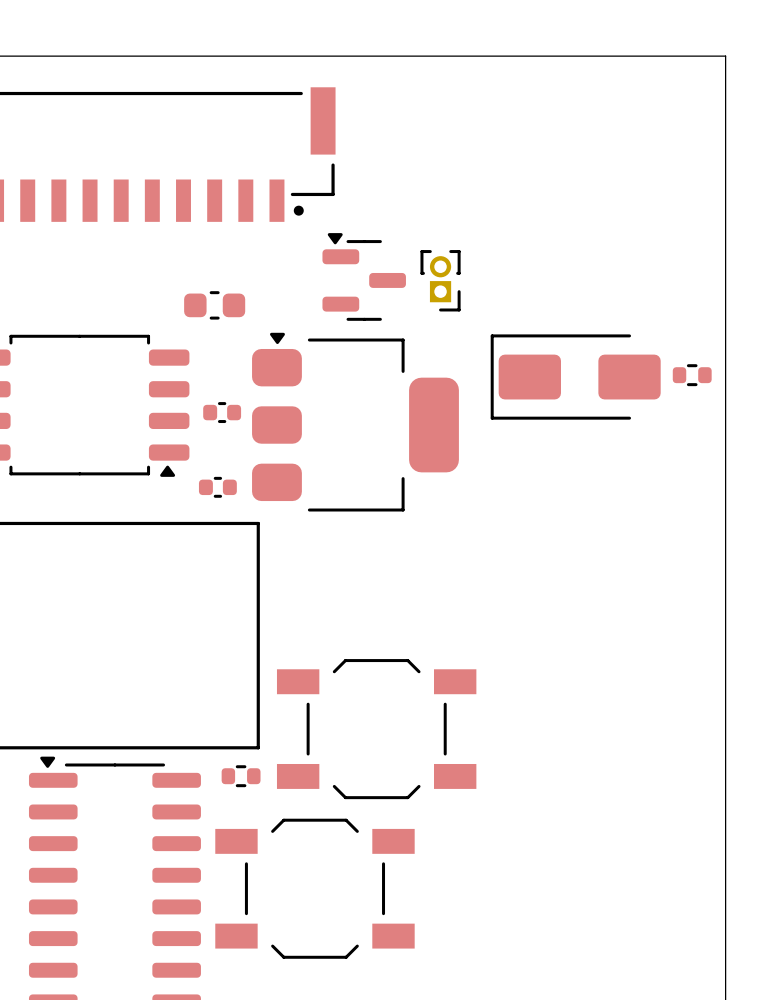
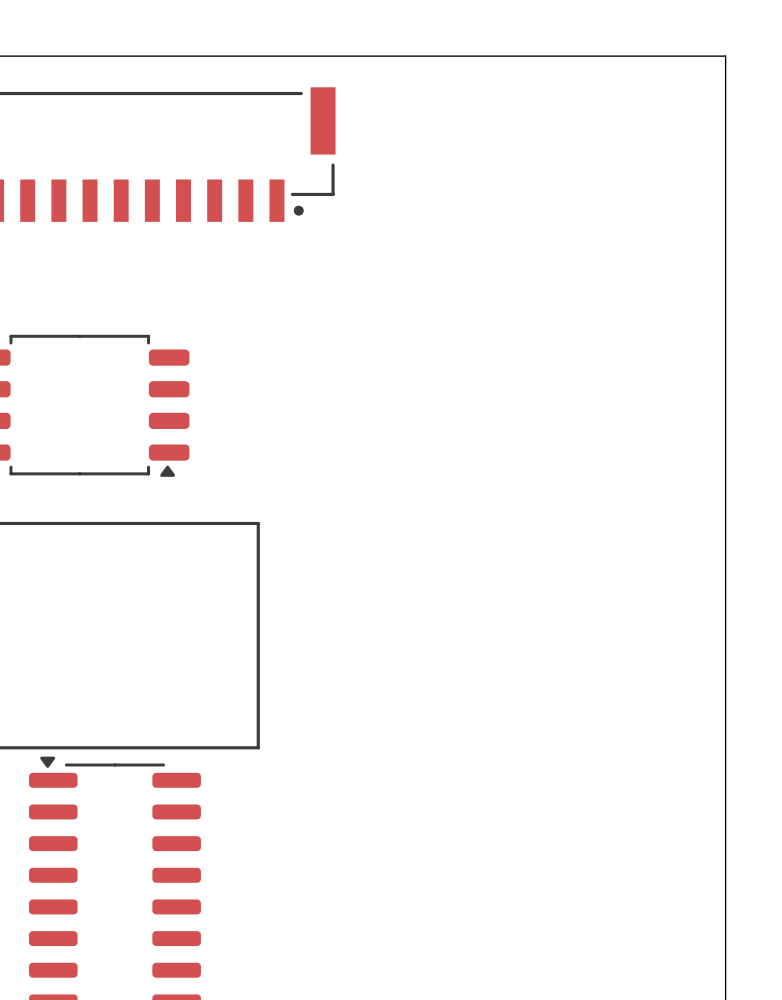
part: (364, 276) -> none
part: (440, 280) -> none
part: (214, 305) -> none
part: (692, 375) -> none
part: (575, 377) -> none
part: (222, 412) -> none
part: (355, 422) -> none
part: (217, 487) -> none
part: (376, 729) -> none
part: (241, 776) -> none
part: (314, 888) -> none

